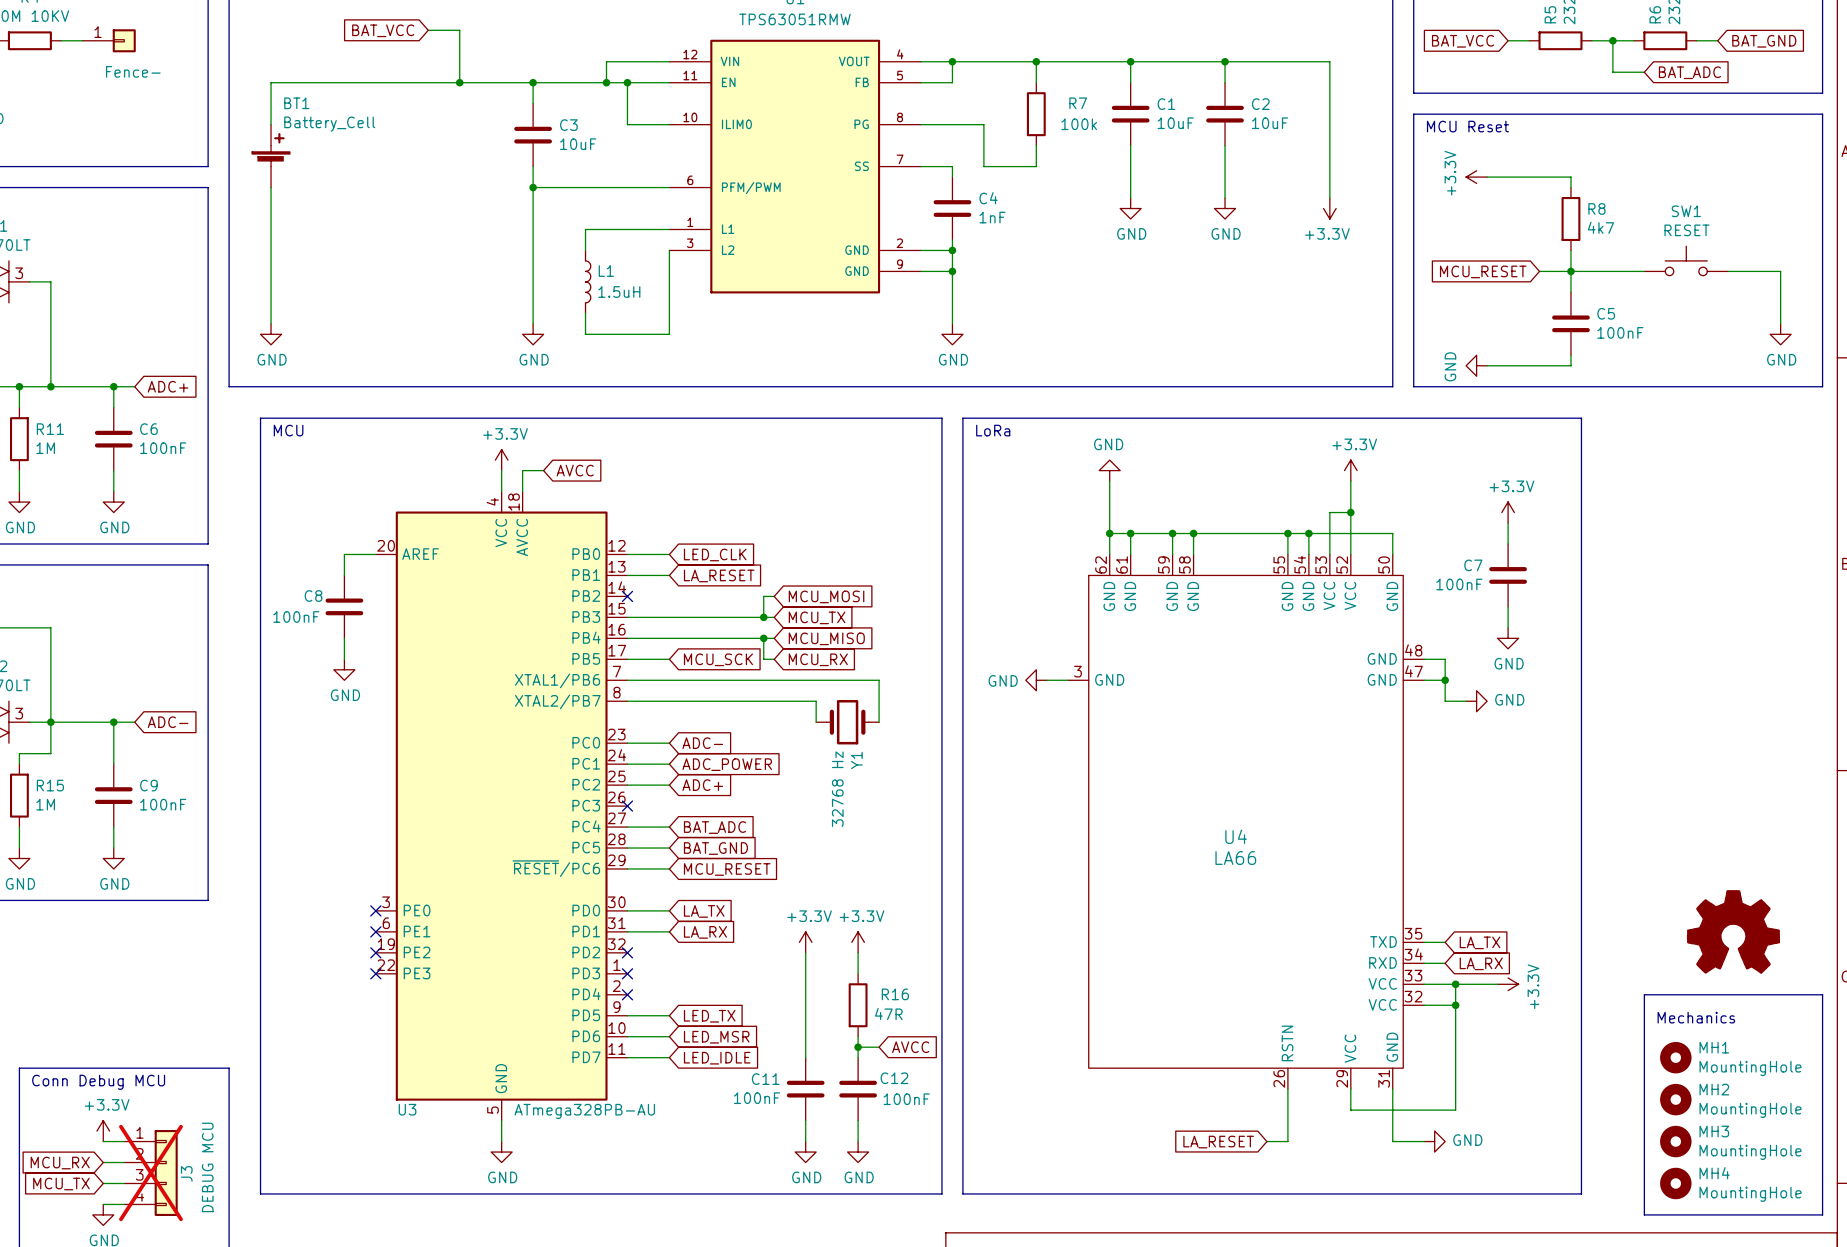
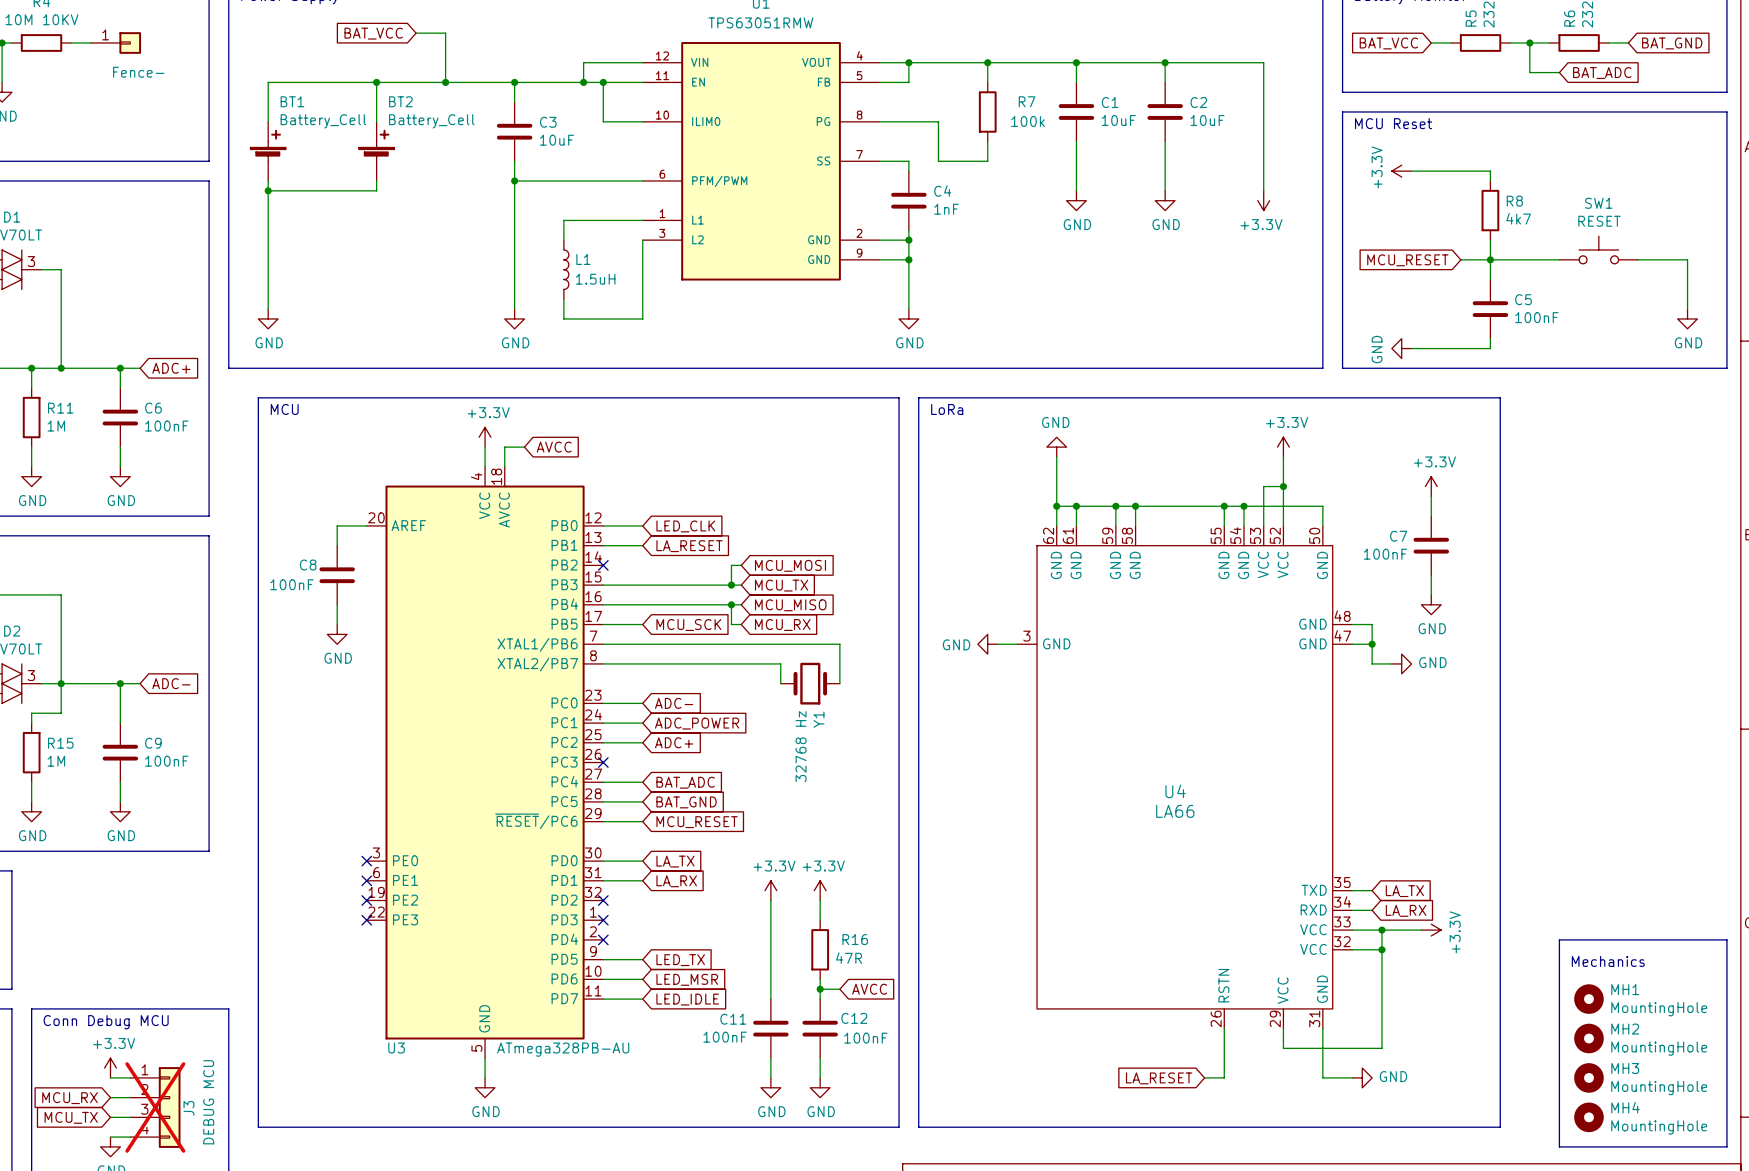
wire: none -> (376, 82) (376, 121)
junction: none -> (376, 82)
BT2: none -> Battery_Cell (376, 151)
wire: none -> (376, 180) (376, 190) (268, 190)
junction: none -> (268, 190)
power symbol: (1733, 931) -> none

